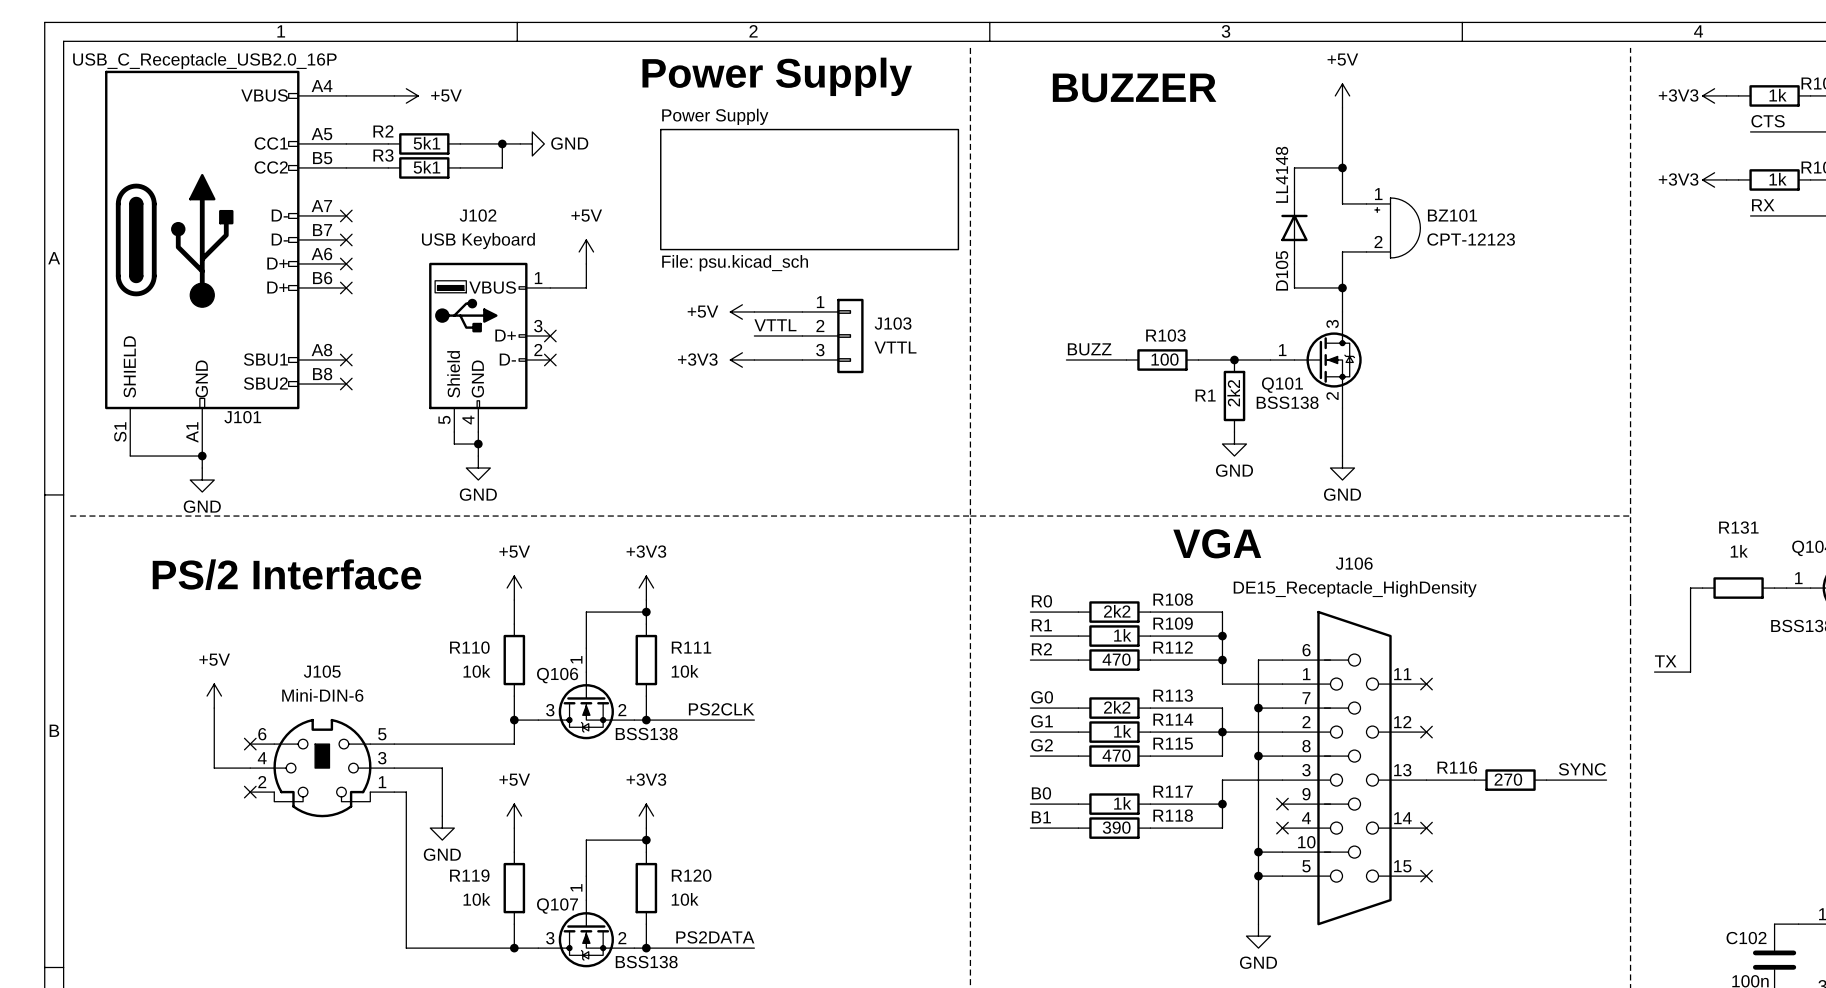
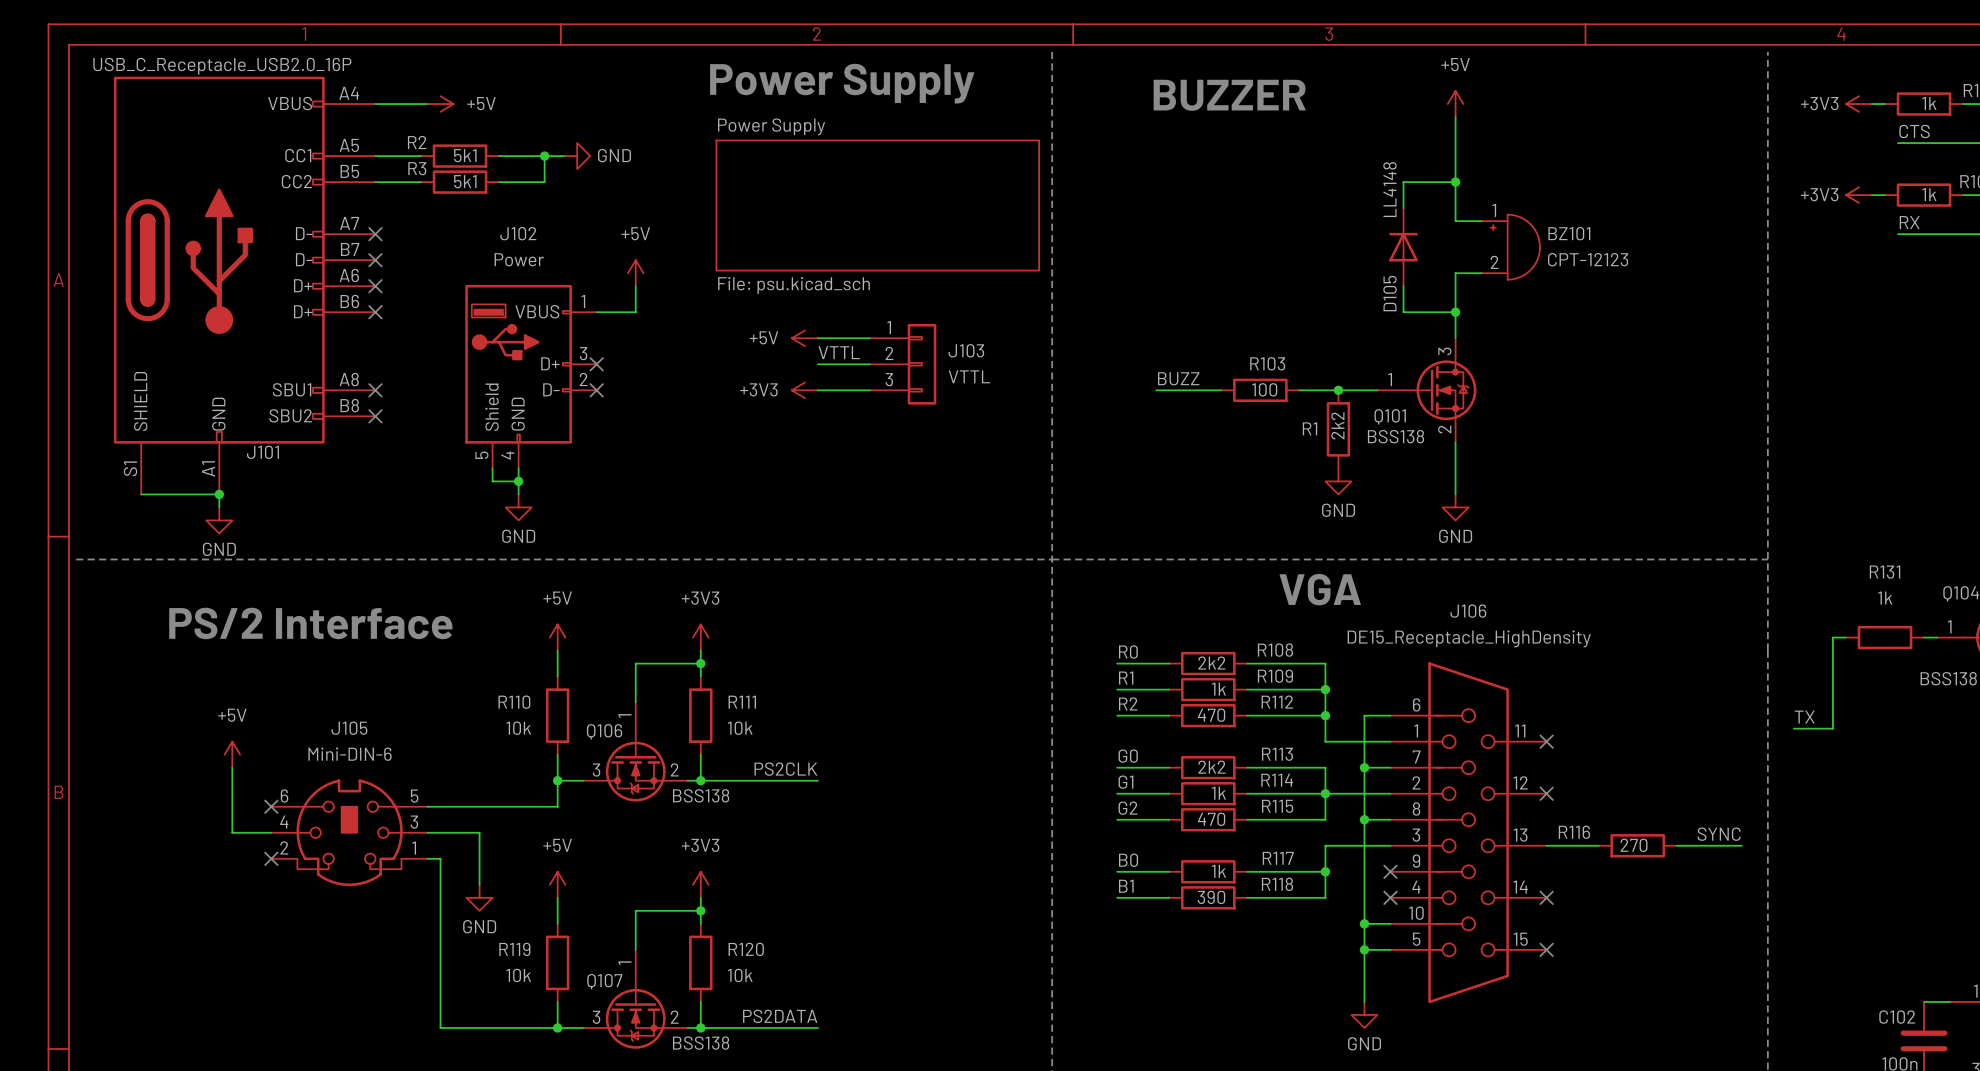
J102 value: USB Keyboard (478, 241) -> Power (519, 259)

